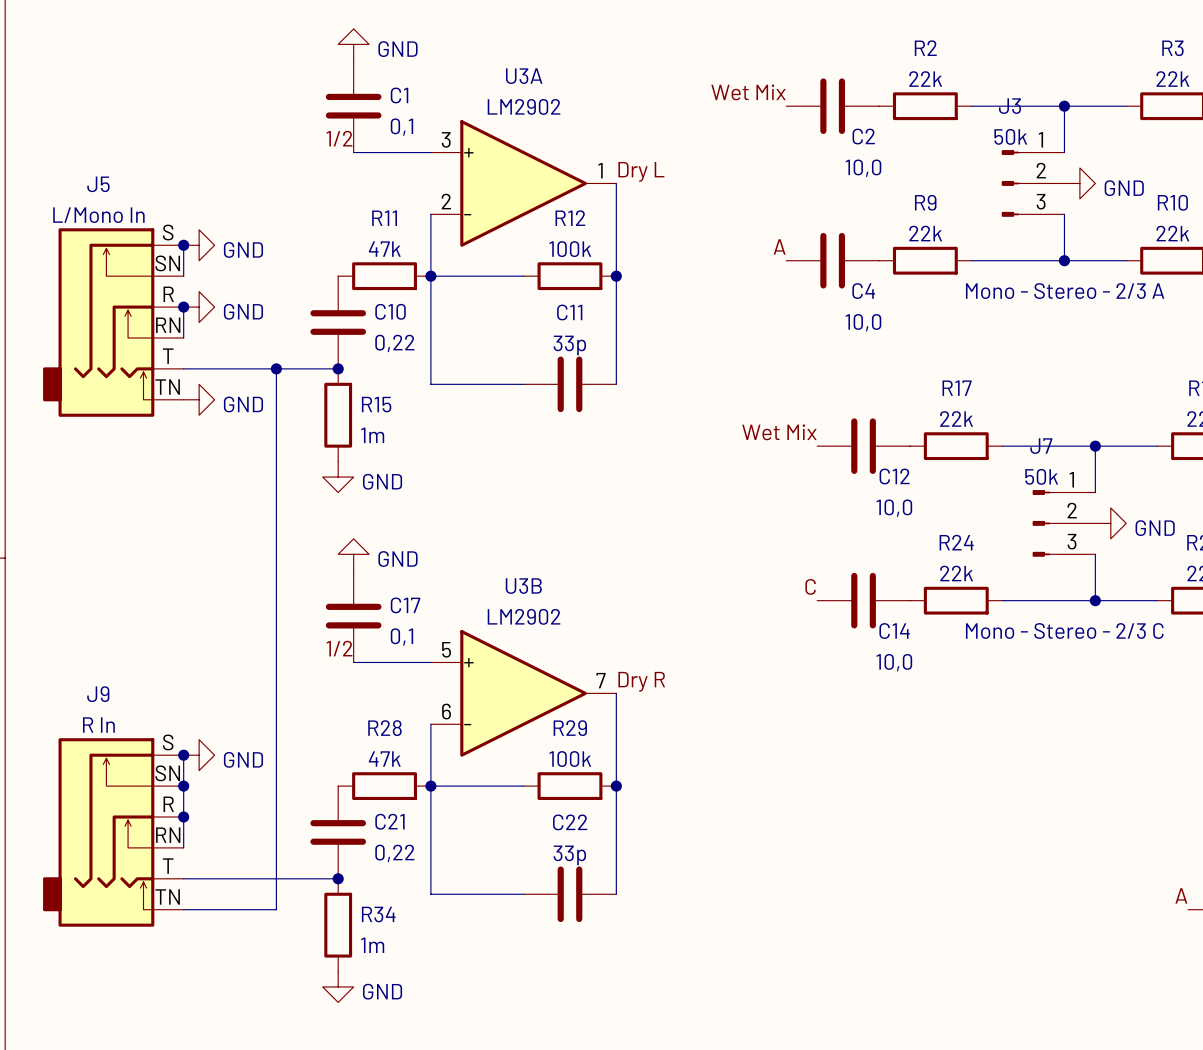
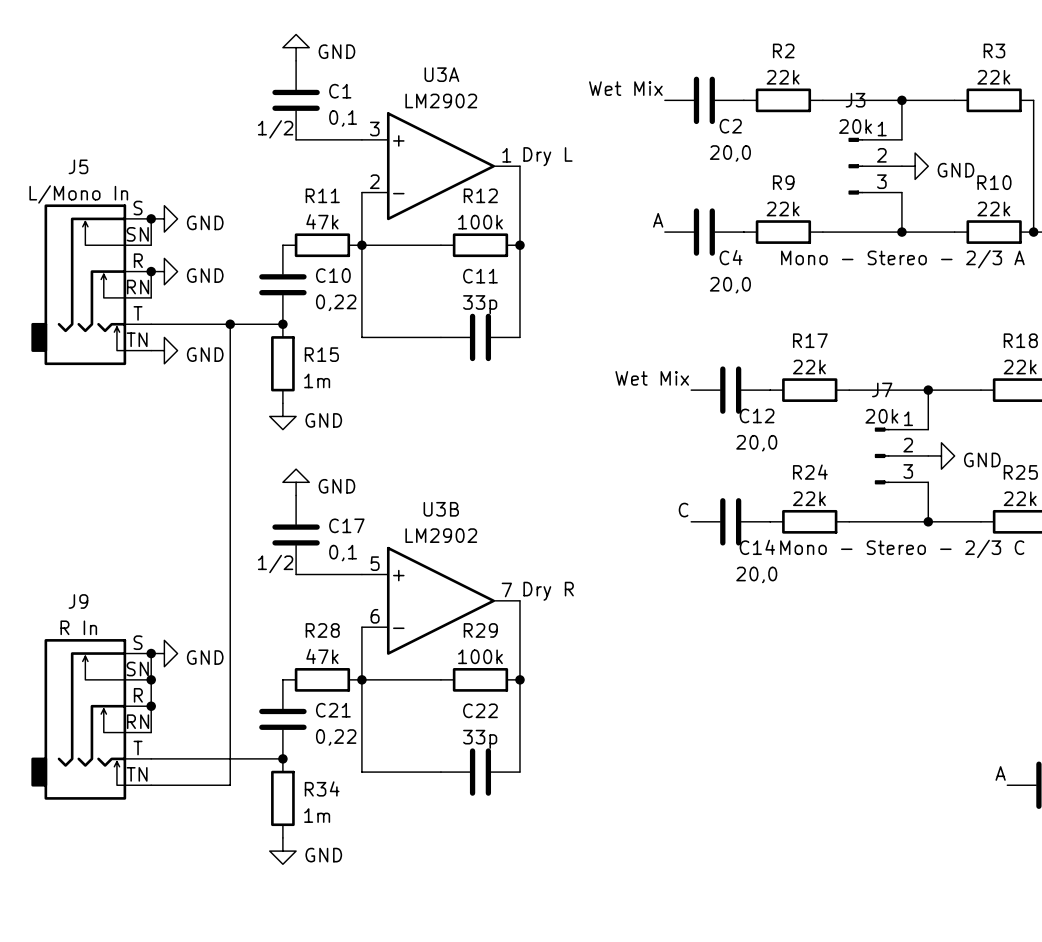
J3 value: 50k (1010, 136) -> 20k (855, 126)
C2 value: 10,0 (863, 168) -> 20,0 (730, 153)
C4 value: 10,0 (863, 322) -> 20,0 (730, 285)
J7 value: 50k (1041, 476) -> 20k (881, 416)
C12 value: 10,0 (894, 508) -> 20,0 (756, 443)
C14 value: 10,0 (894, 662) -> 20,0 (756, 574)

